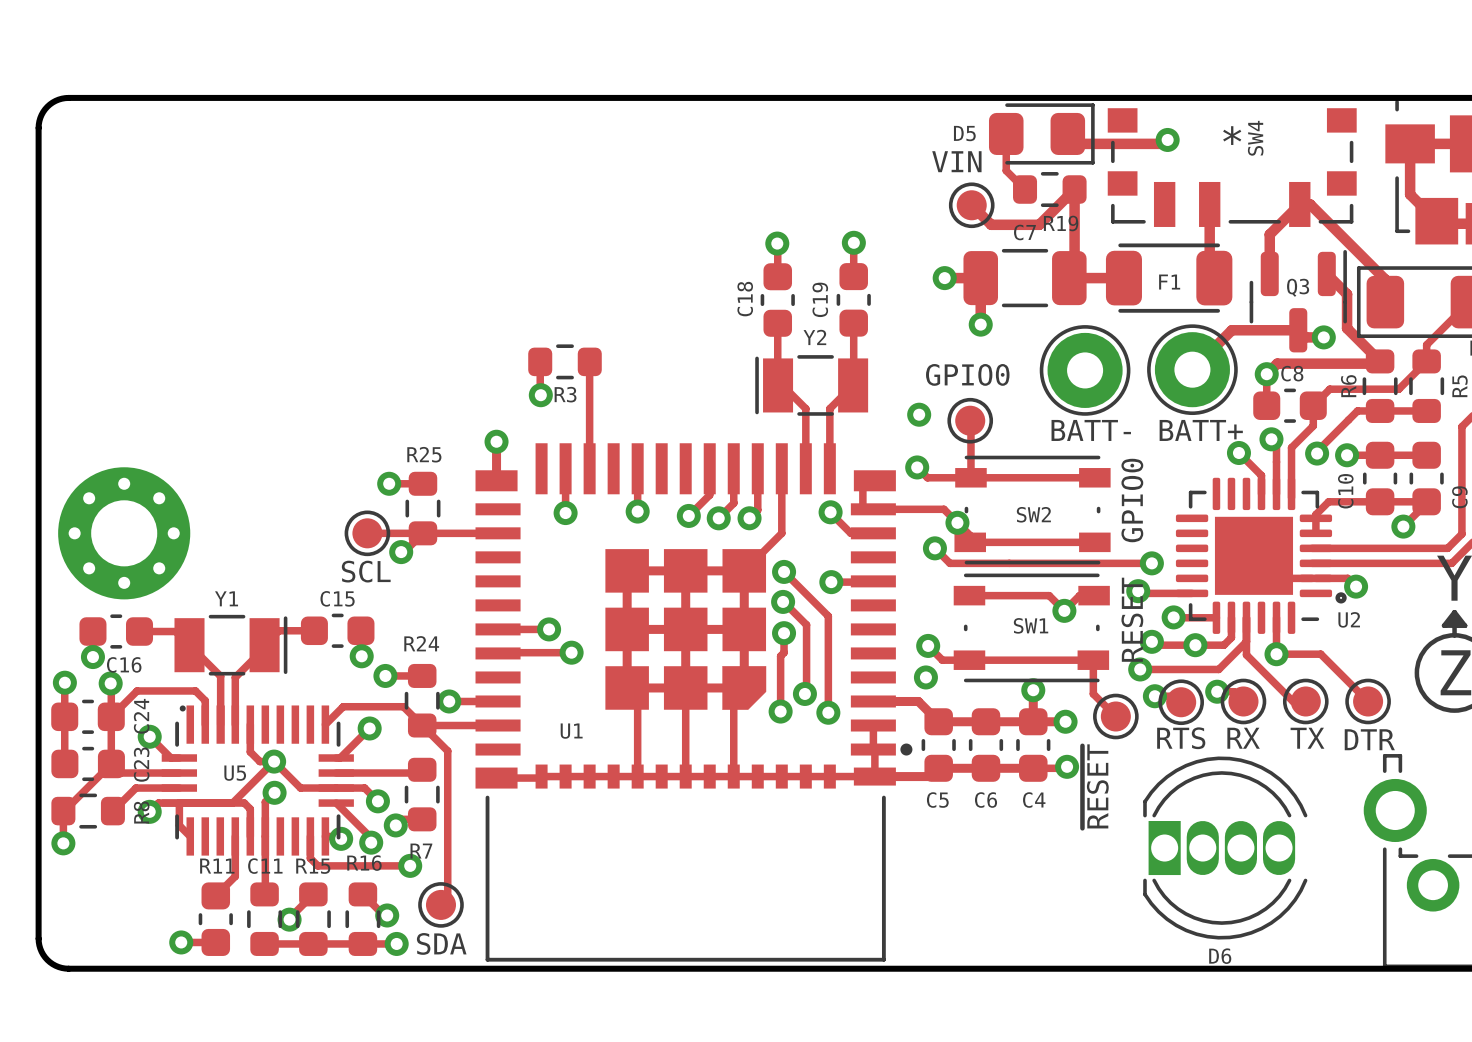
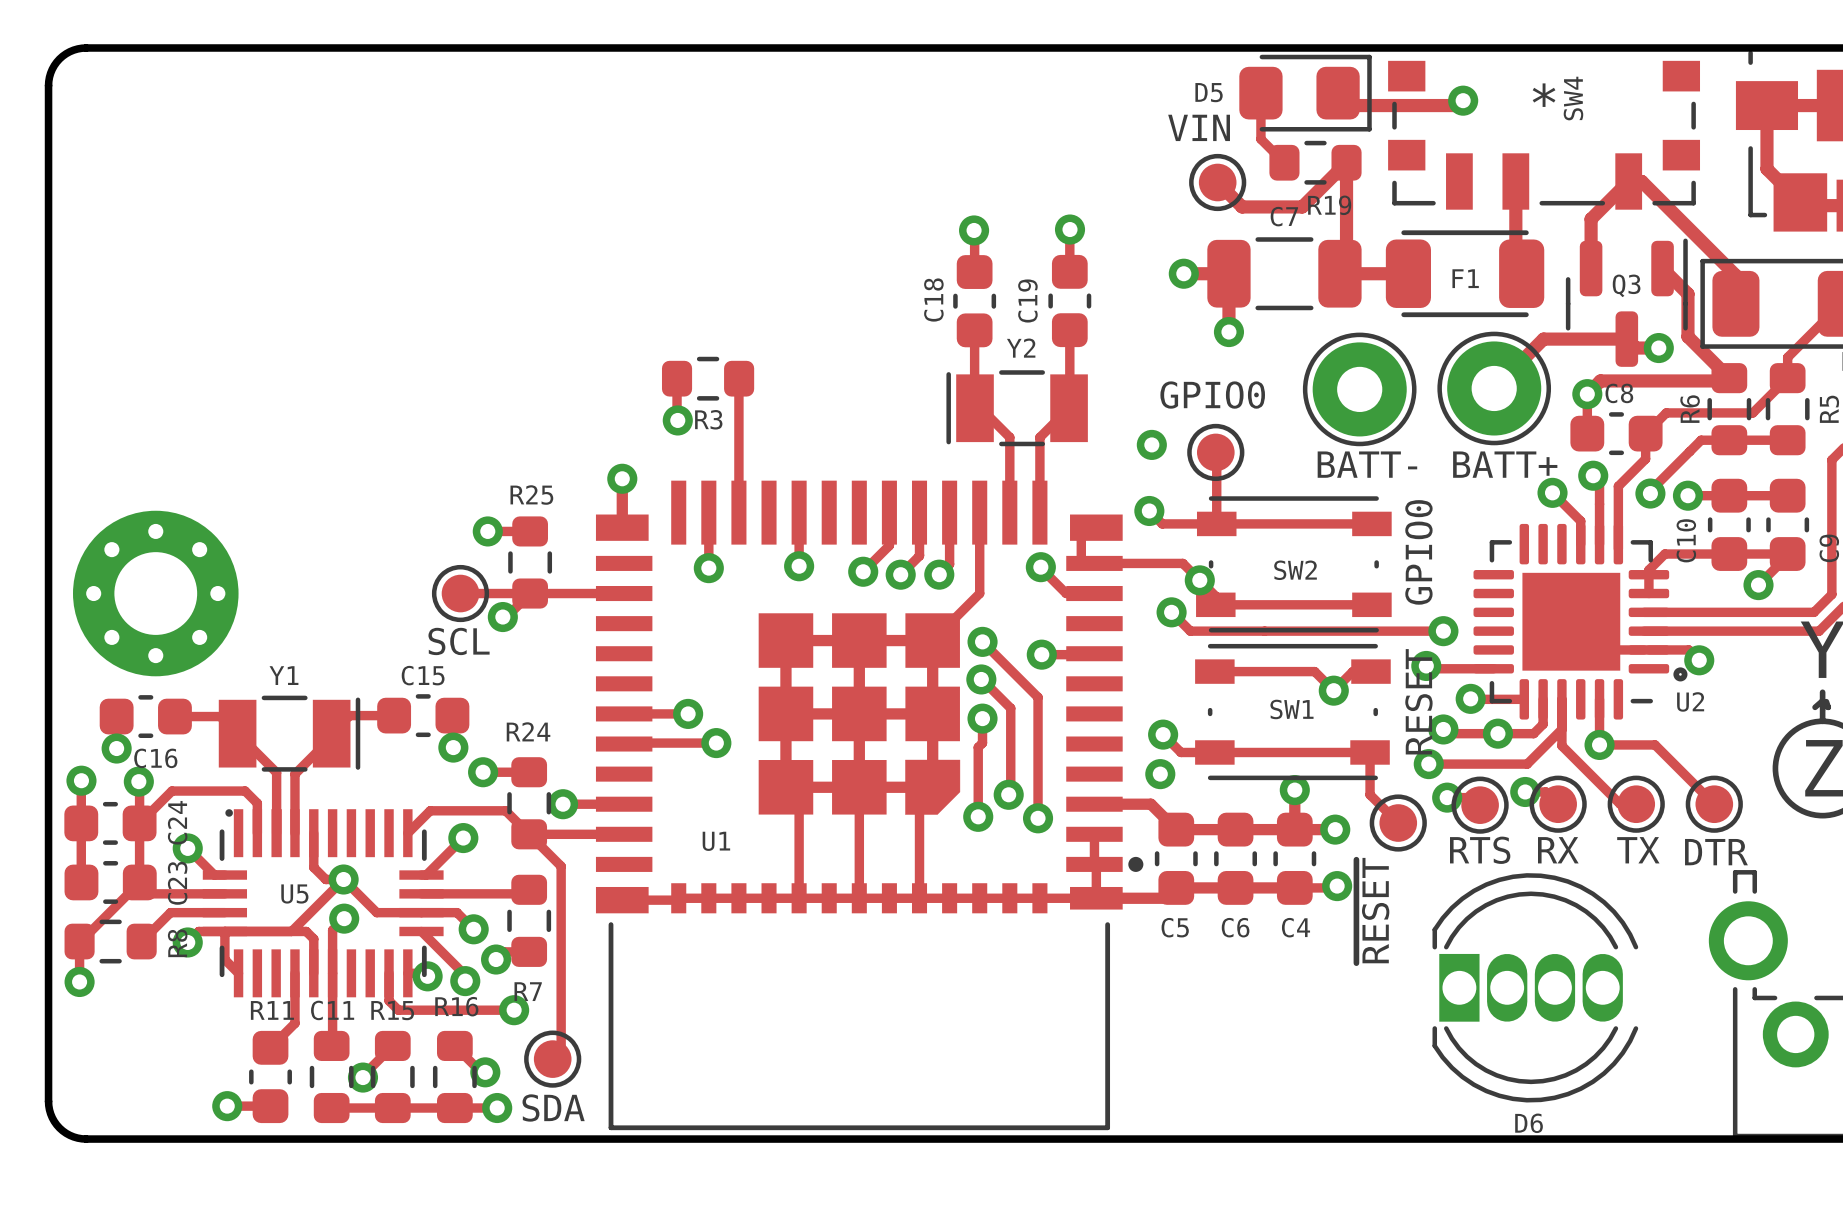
line: (1454, 612) (1465, 625) (1444, 625) (1454, 612) -> none

